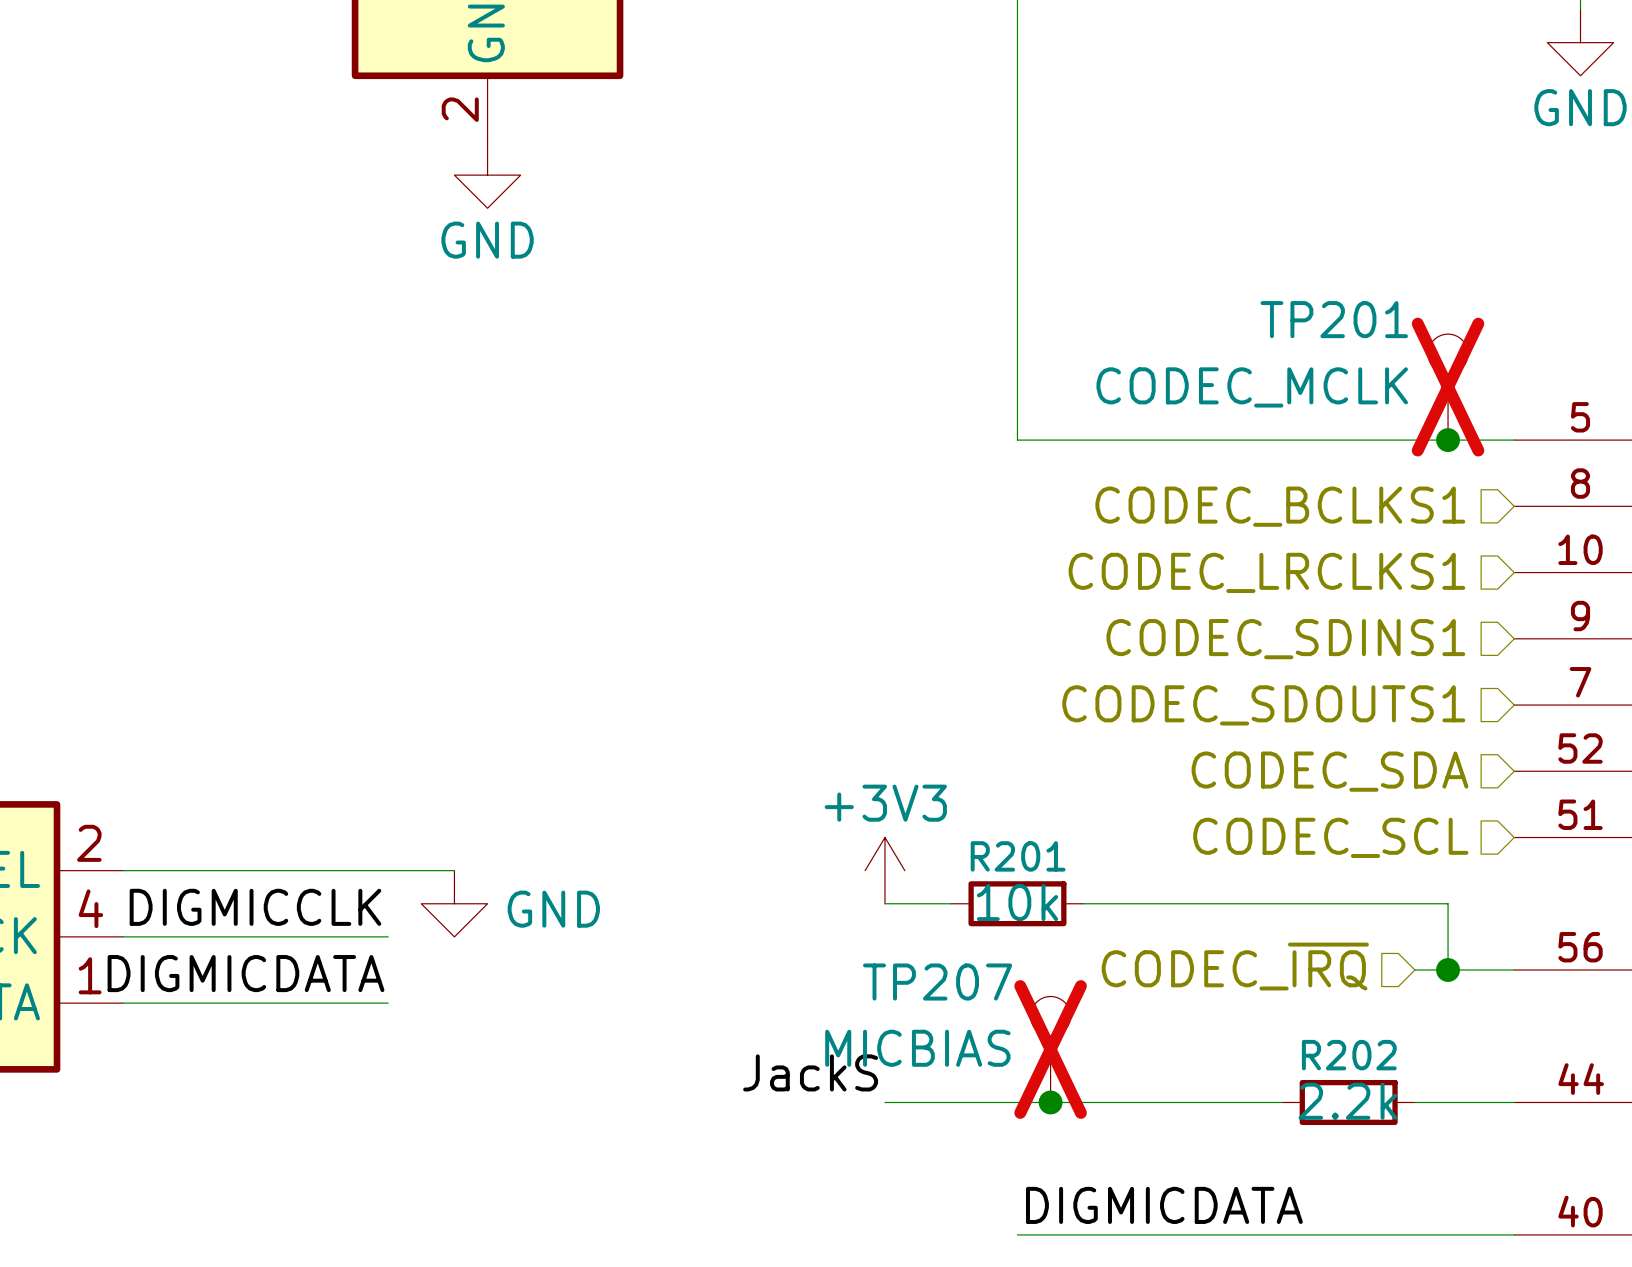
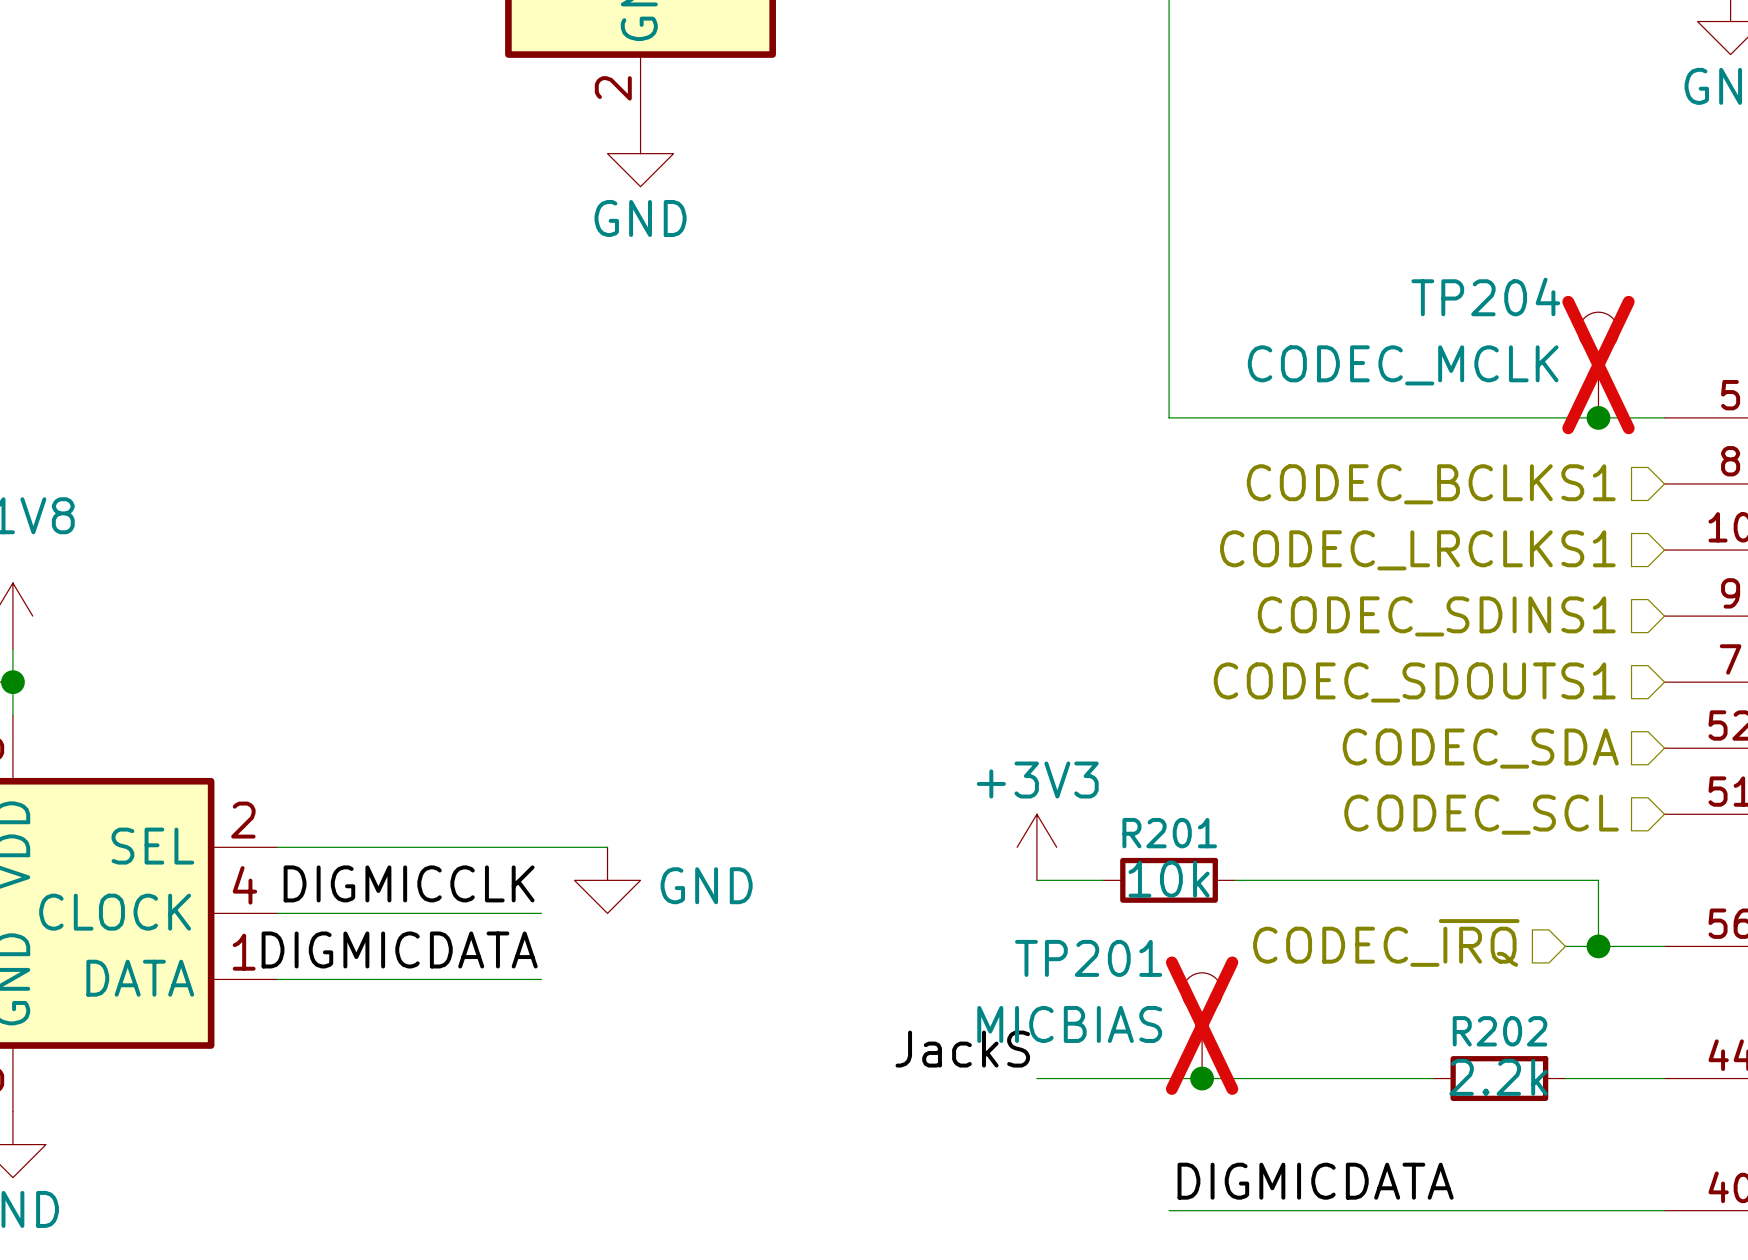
TP201 name: TP201 (1334, 319) -> TP204 (1485, 296)
TP207 name: TP207 (937, 982) -> TP201 (1088, 958)

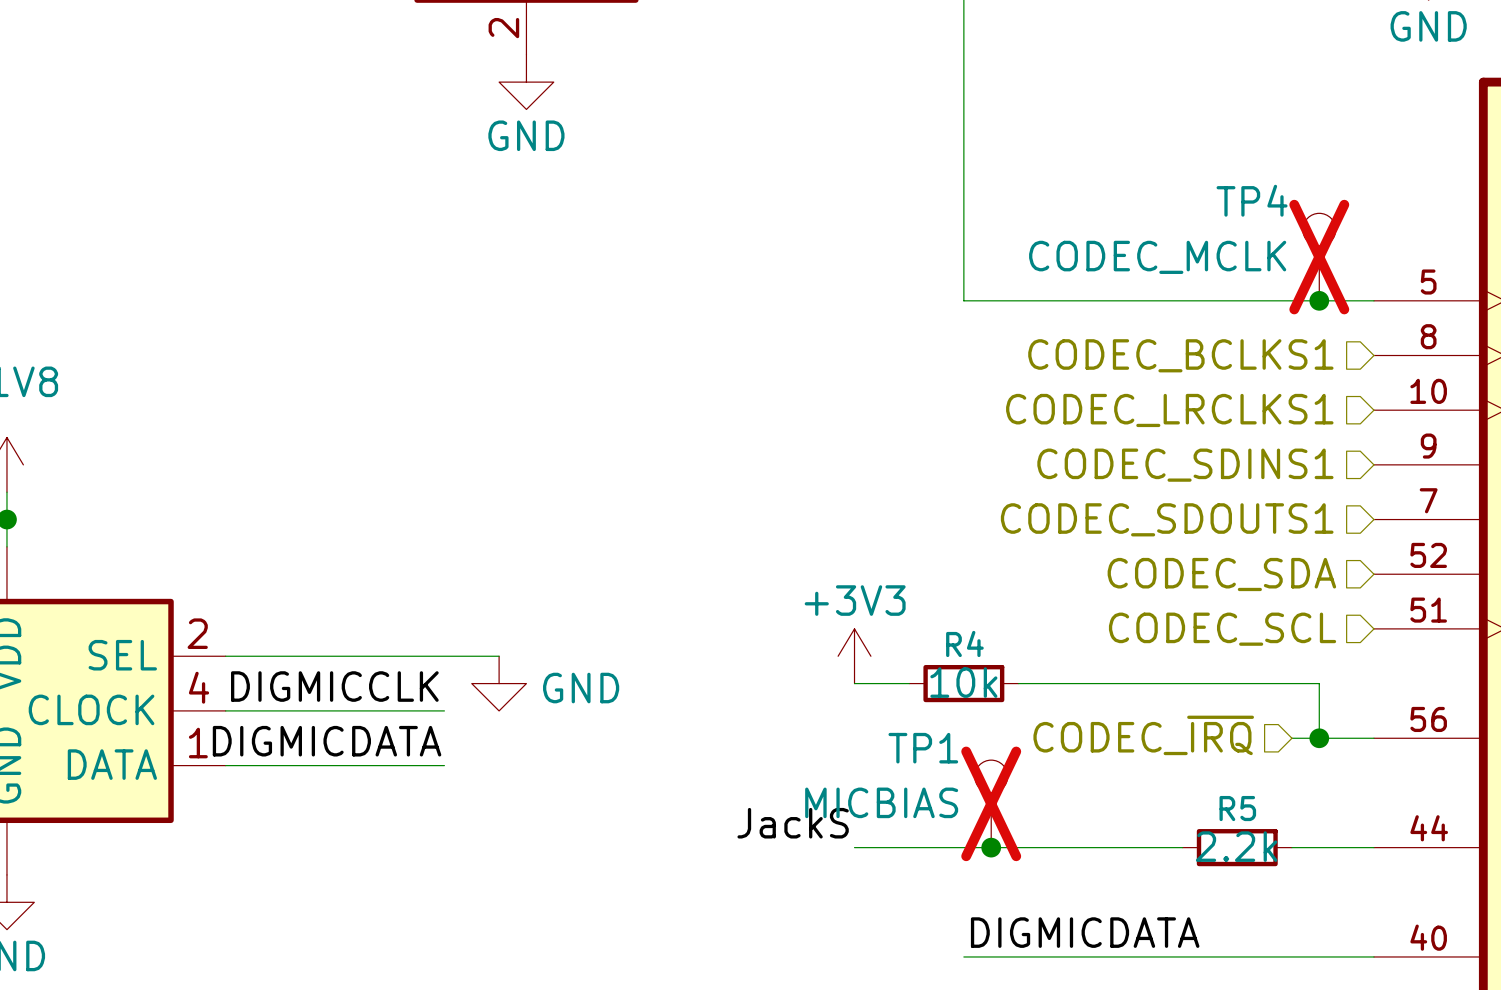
TP204 name: TP204 (1485, 296) -> TP4 (1252, 200)
R201 name: R201 (1169, 833) -> R4 (964, 643)
TP201 name: TP201 (1088, 958) -> TP1 (923, 748)
R202 name: R202 (1500, 1031) -> R5 (1237, 808)

